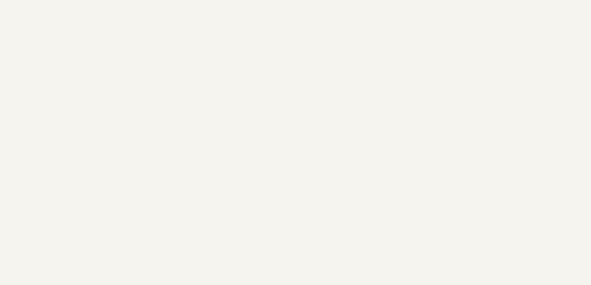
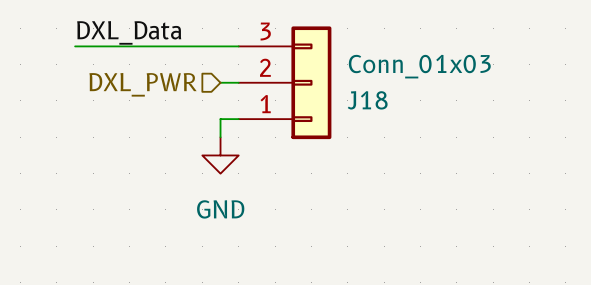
label: none -> DXL_Data (129, 32)
wire: none -> (75, 46) (238, 46)
hierarchical label: none -> DXL_PWR (143, 84)
wire: none -> (220, 82) (238, 82)
J18: none -> Conn_01x03 (285, 82)
wire: none -> (238, 119) (220, 119) (220, 137)
power symbol: none -> GND (220, 155)

